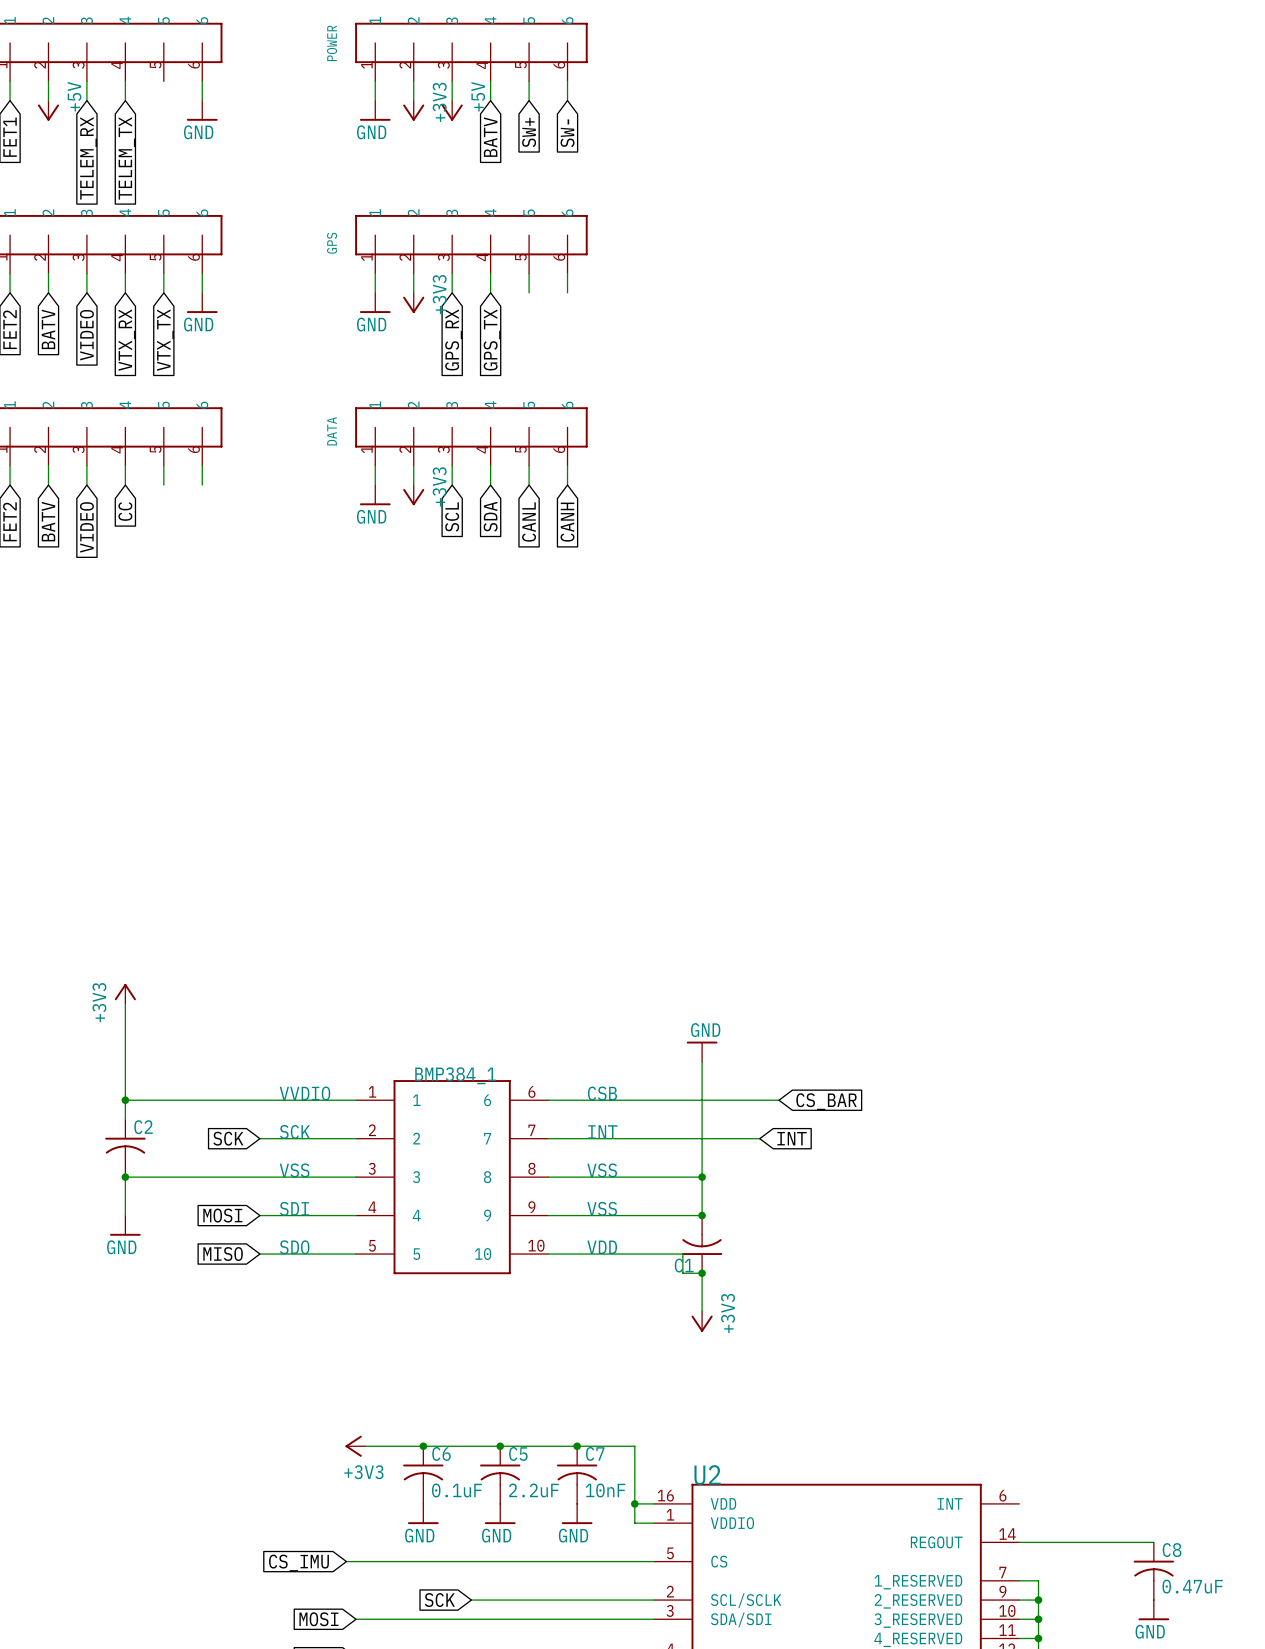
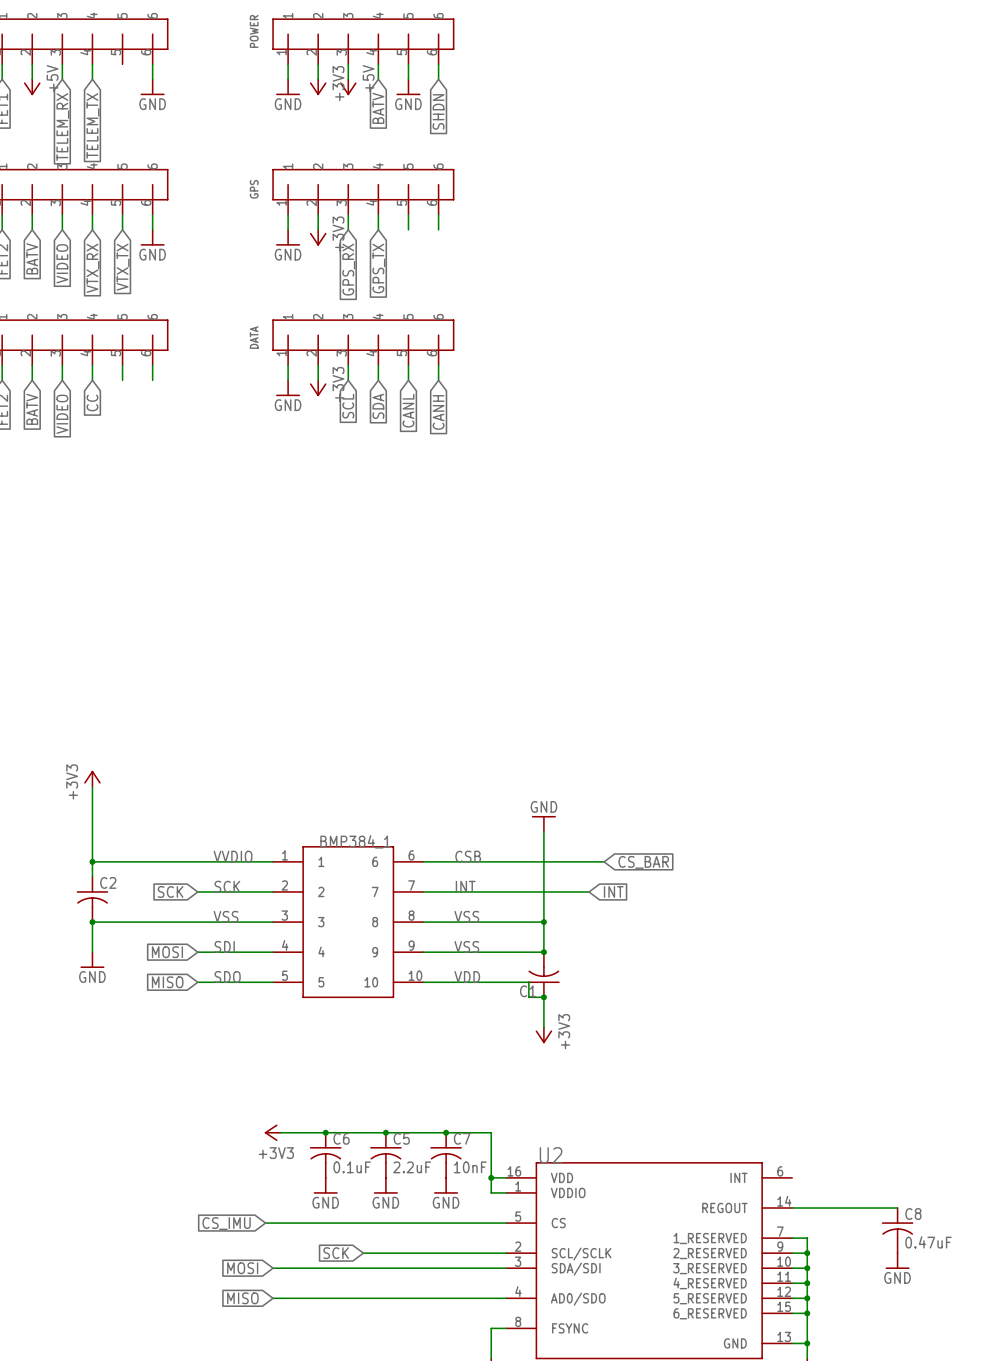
power symbol: none -> GND (408, 87)
global label: SW+ (529, 132) -> none
global label: SW- (567, 133) -> SHDN (438, 111)

